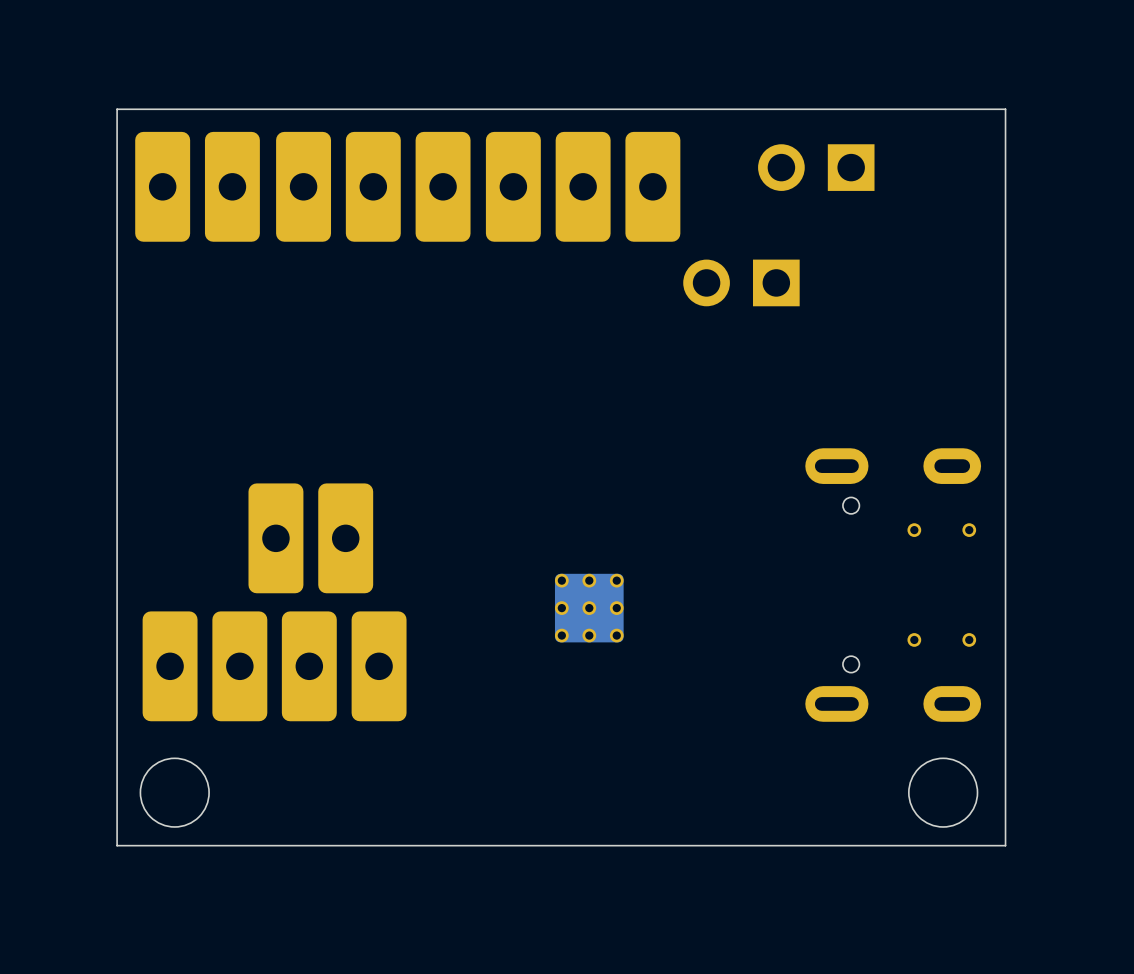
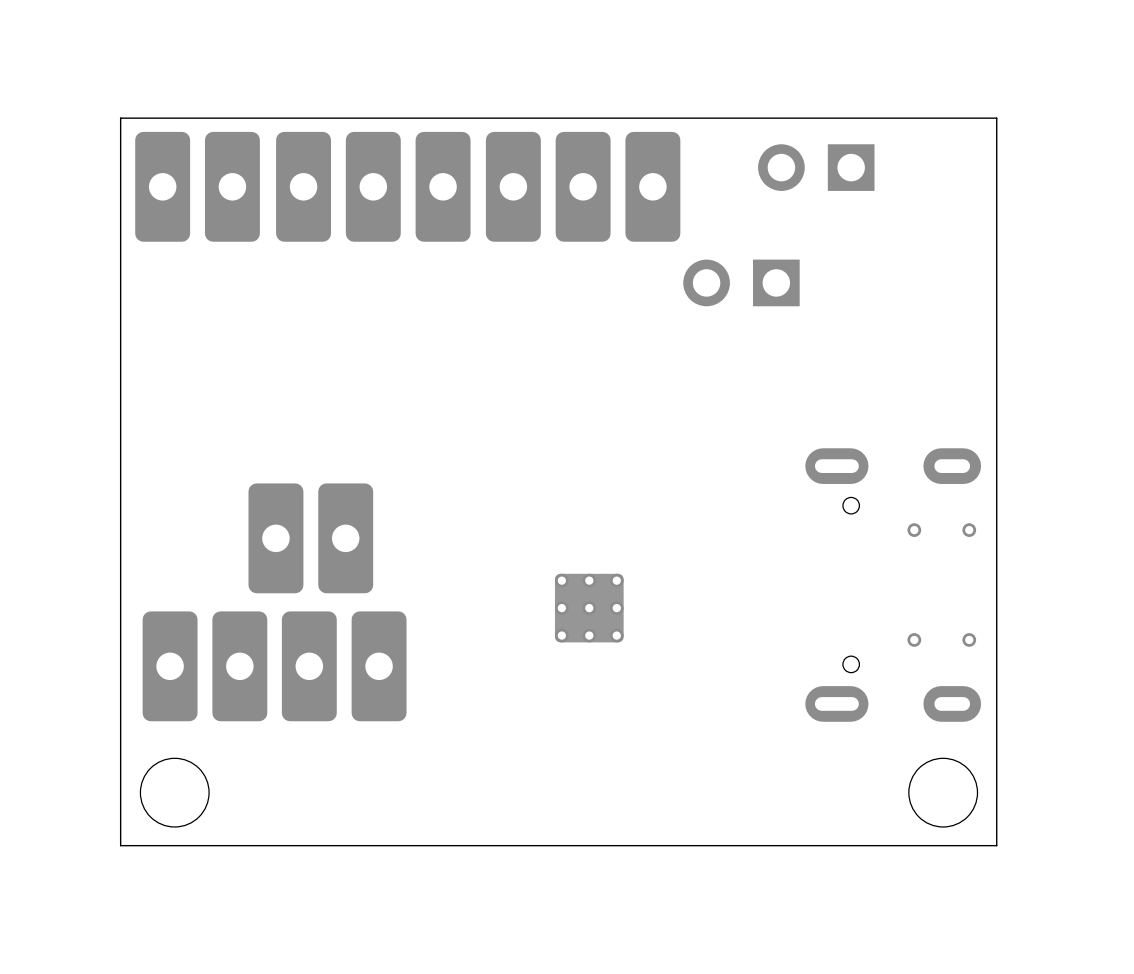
board edge: (996, 845) (1005, 845) (1005, 109) (117, 109) (117, 845) (120, 845) -> (996, 845) (996, 118) (120, 118) (120, 845)

